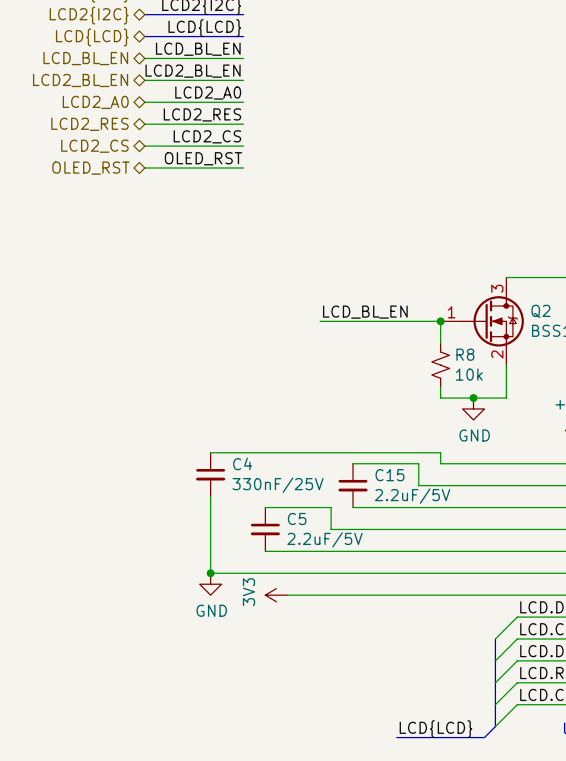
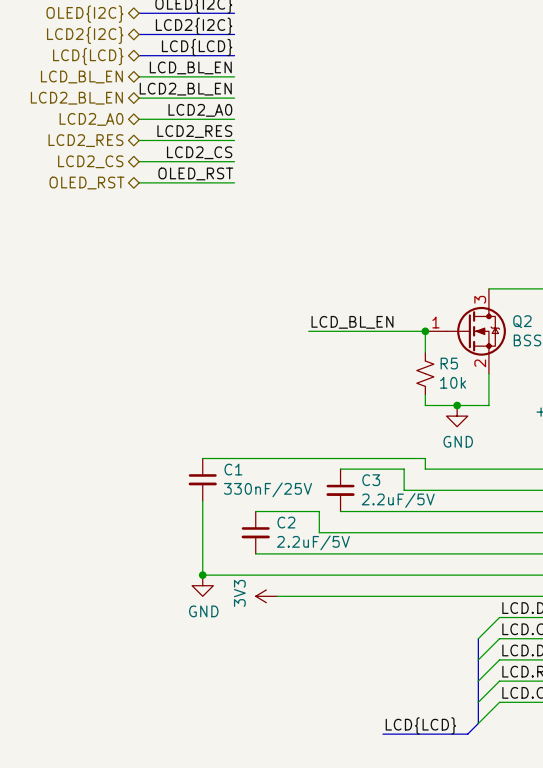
R8 name: R8 (465, 354) -> R5 (449, 363)
C4 name: C4 (242, 463) -> C1 (233, 469)
C15 name: C15 (389, 475) -> C3 (371, 480)
C5 name: C5 (297, 518) -> C2 (286, 522)

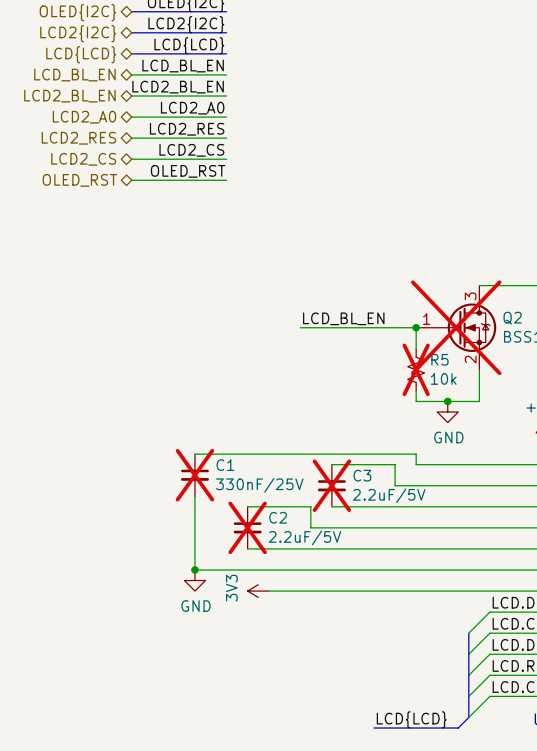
Q2 do-not-place cross: none -> (456, 327)
R5 do-not-place cross: none -> (416, 369)
C1 do-not-place cross: none -> (194, 475)
C3 do-not-place cross: none -> (331, 485)
C2 do-not-place cross: none -> (247, 527)

